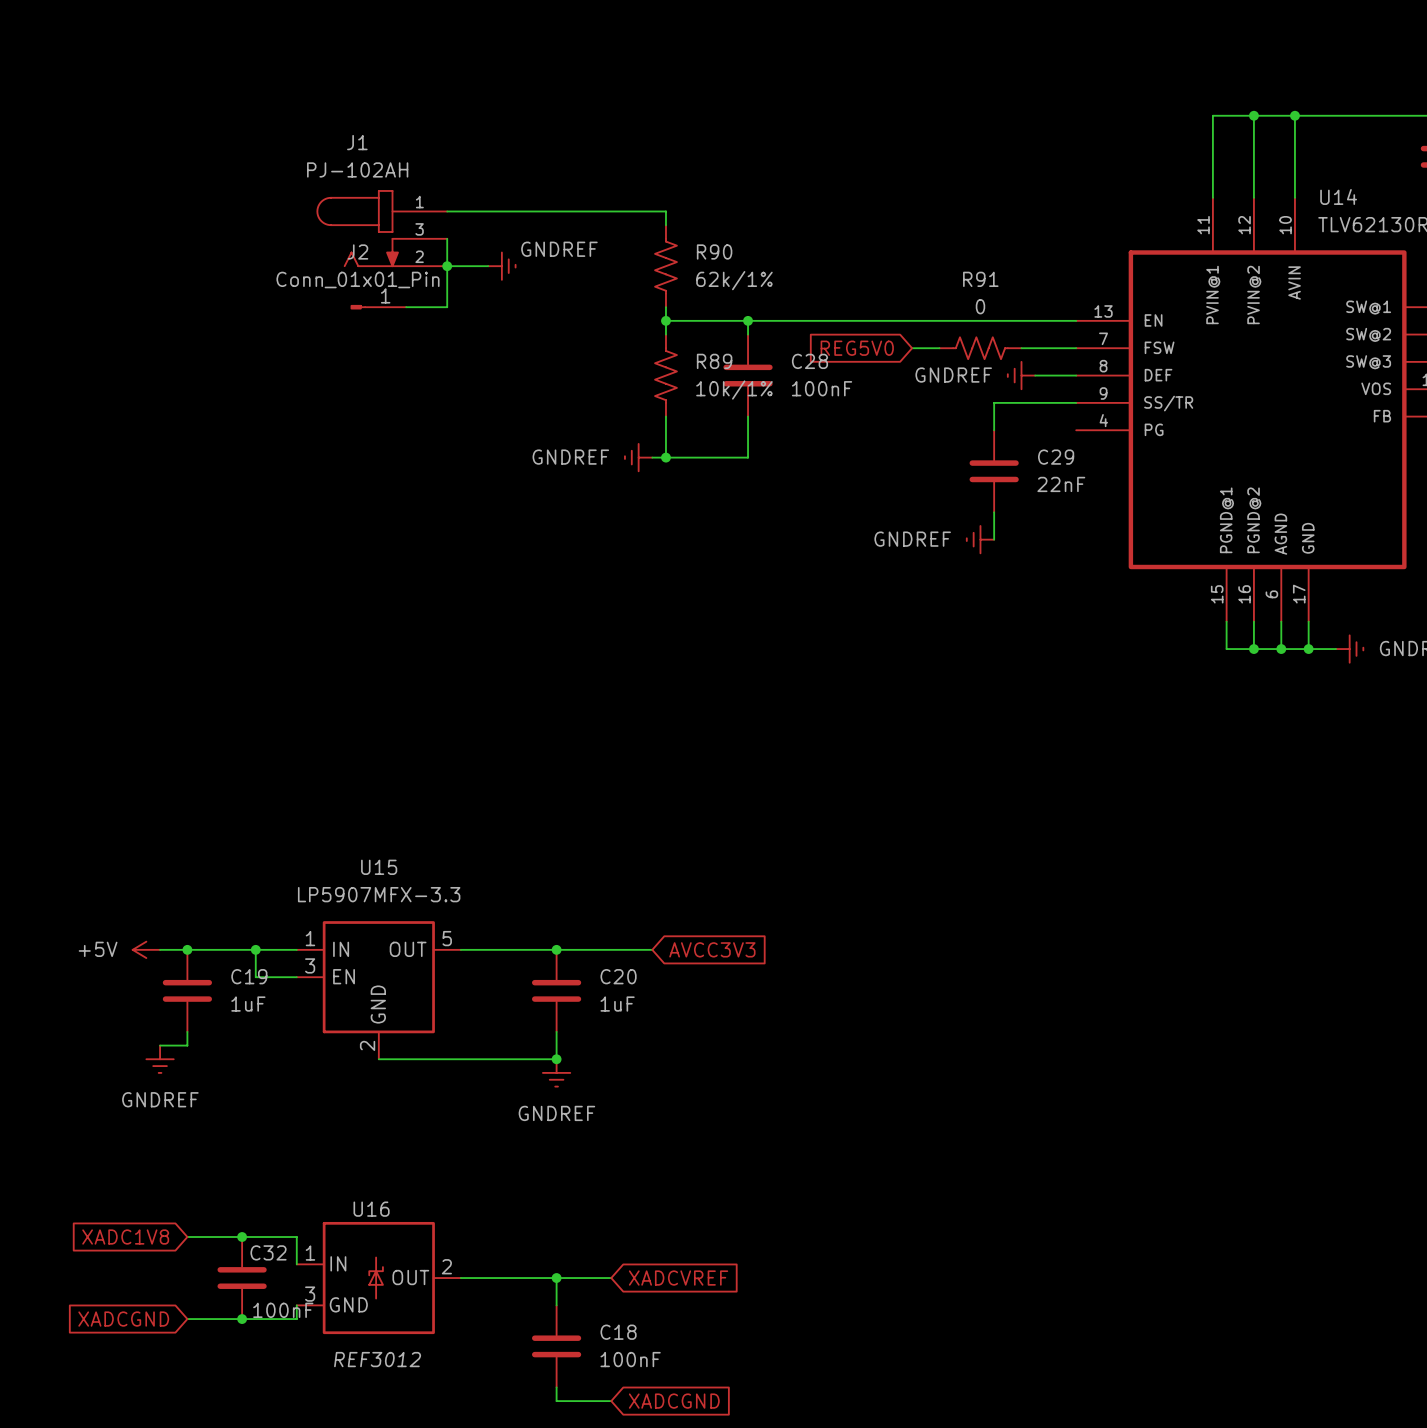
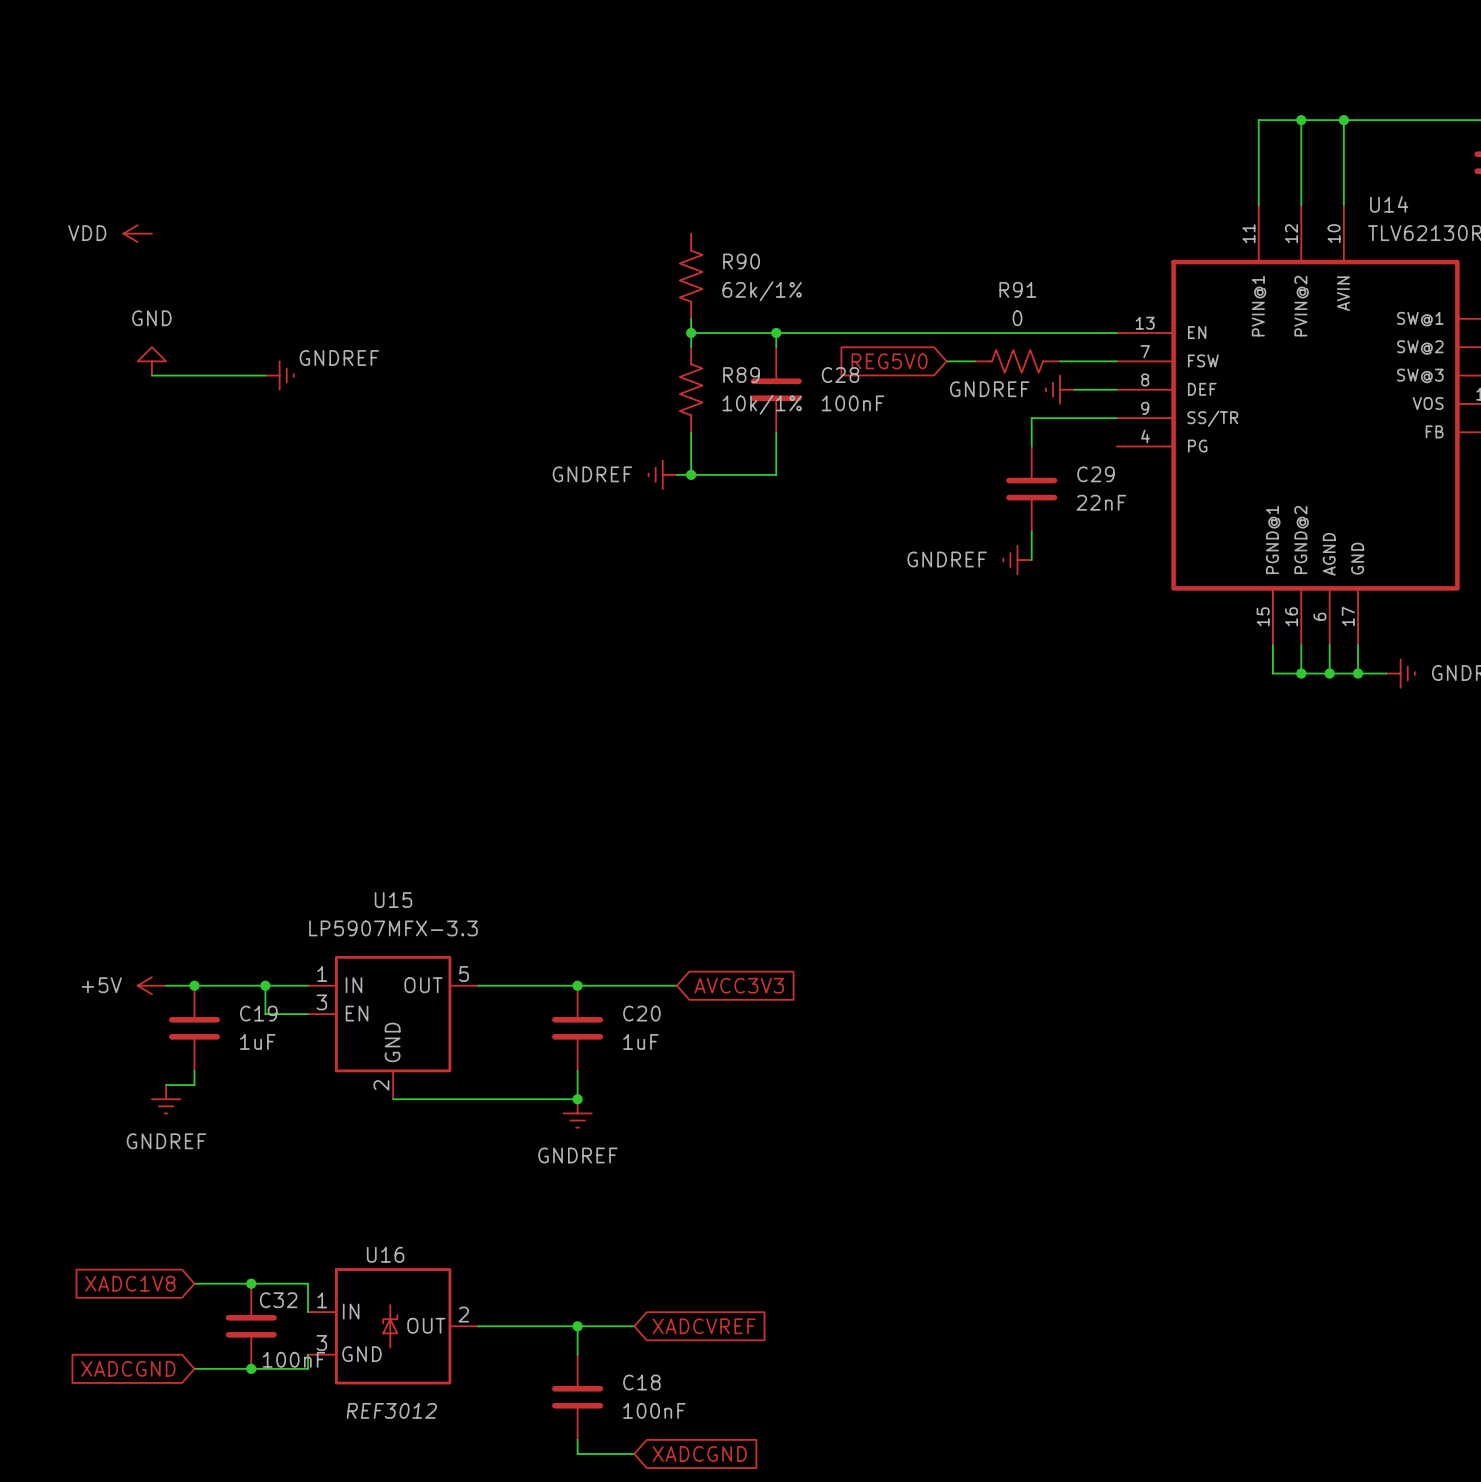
wire: (447, 211) (665, 211) (665, 225) -> none
power symbol: none -> VDD (137, 233)
J1: PJ-102AH (381, 228) -> none
wire: (447, 238) (447, 307) (406, 307) -> none
wire: (447, 266) (488, 266) -> none
junction: (447, 266) -> none
power symbol position: GNDREF (501, 266) -> GNDREF (279, 375)
J2: Conn_01x01_Pin (378, 307) -> none
power symbol: none -> GND (151, 361)
wire: none -> (151, 375) (265, 375)

